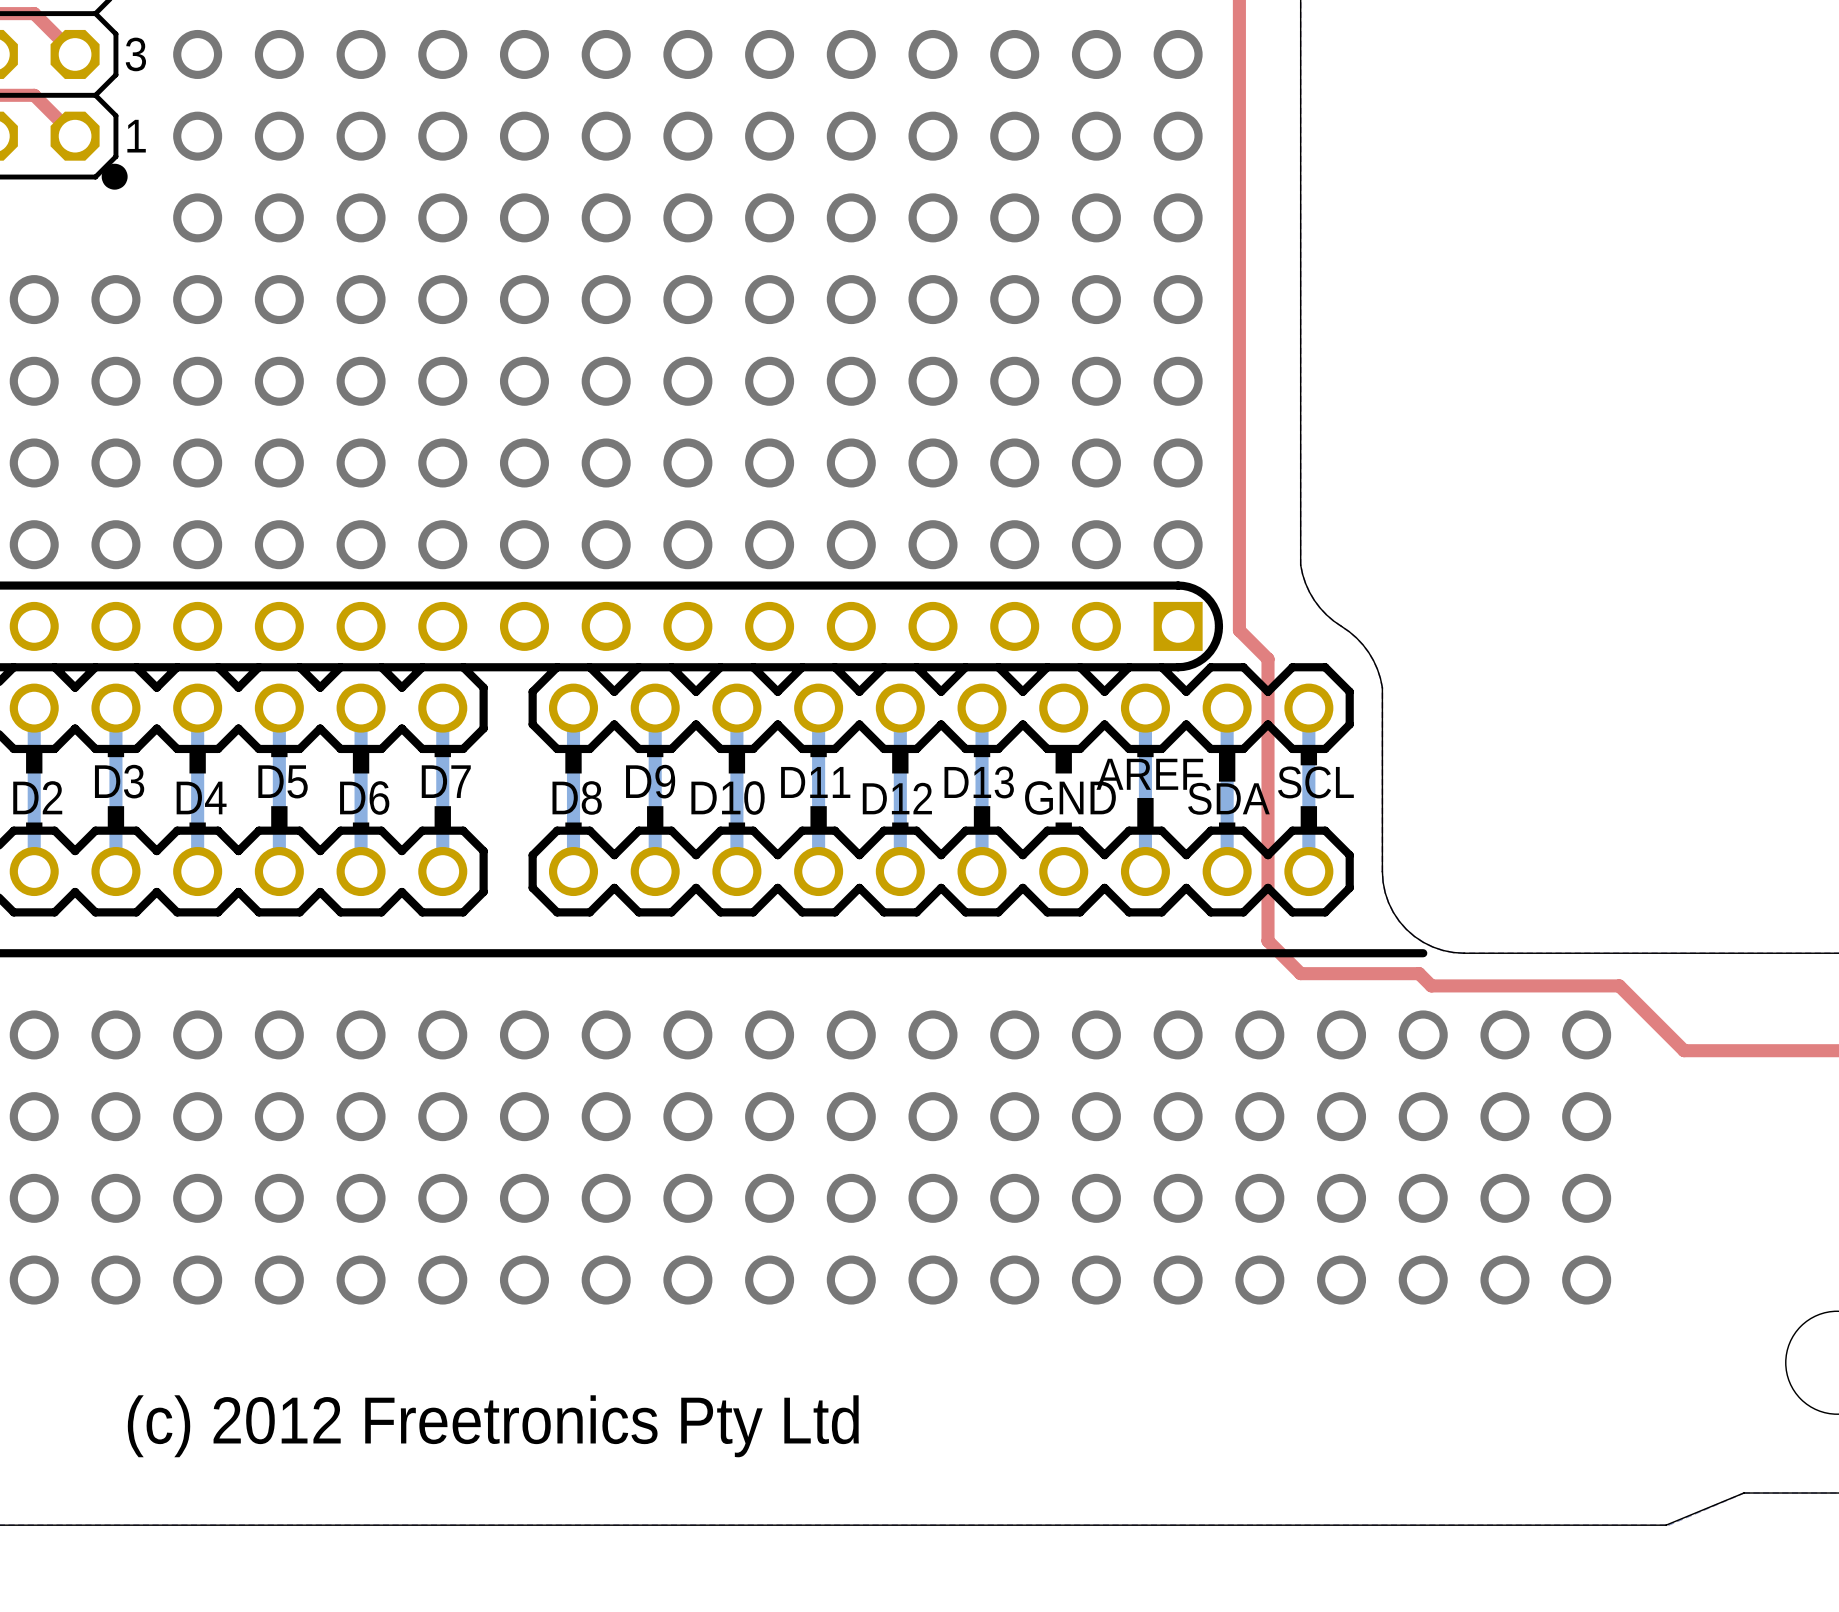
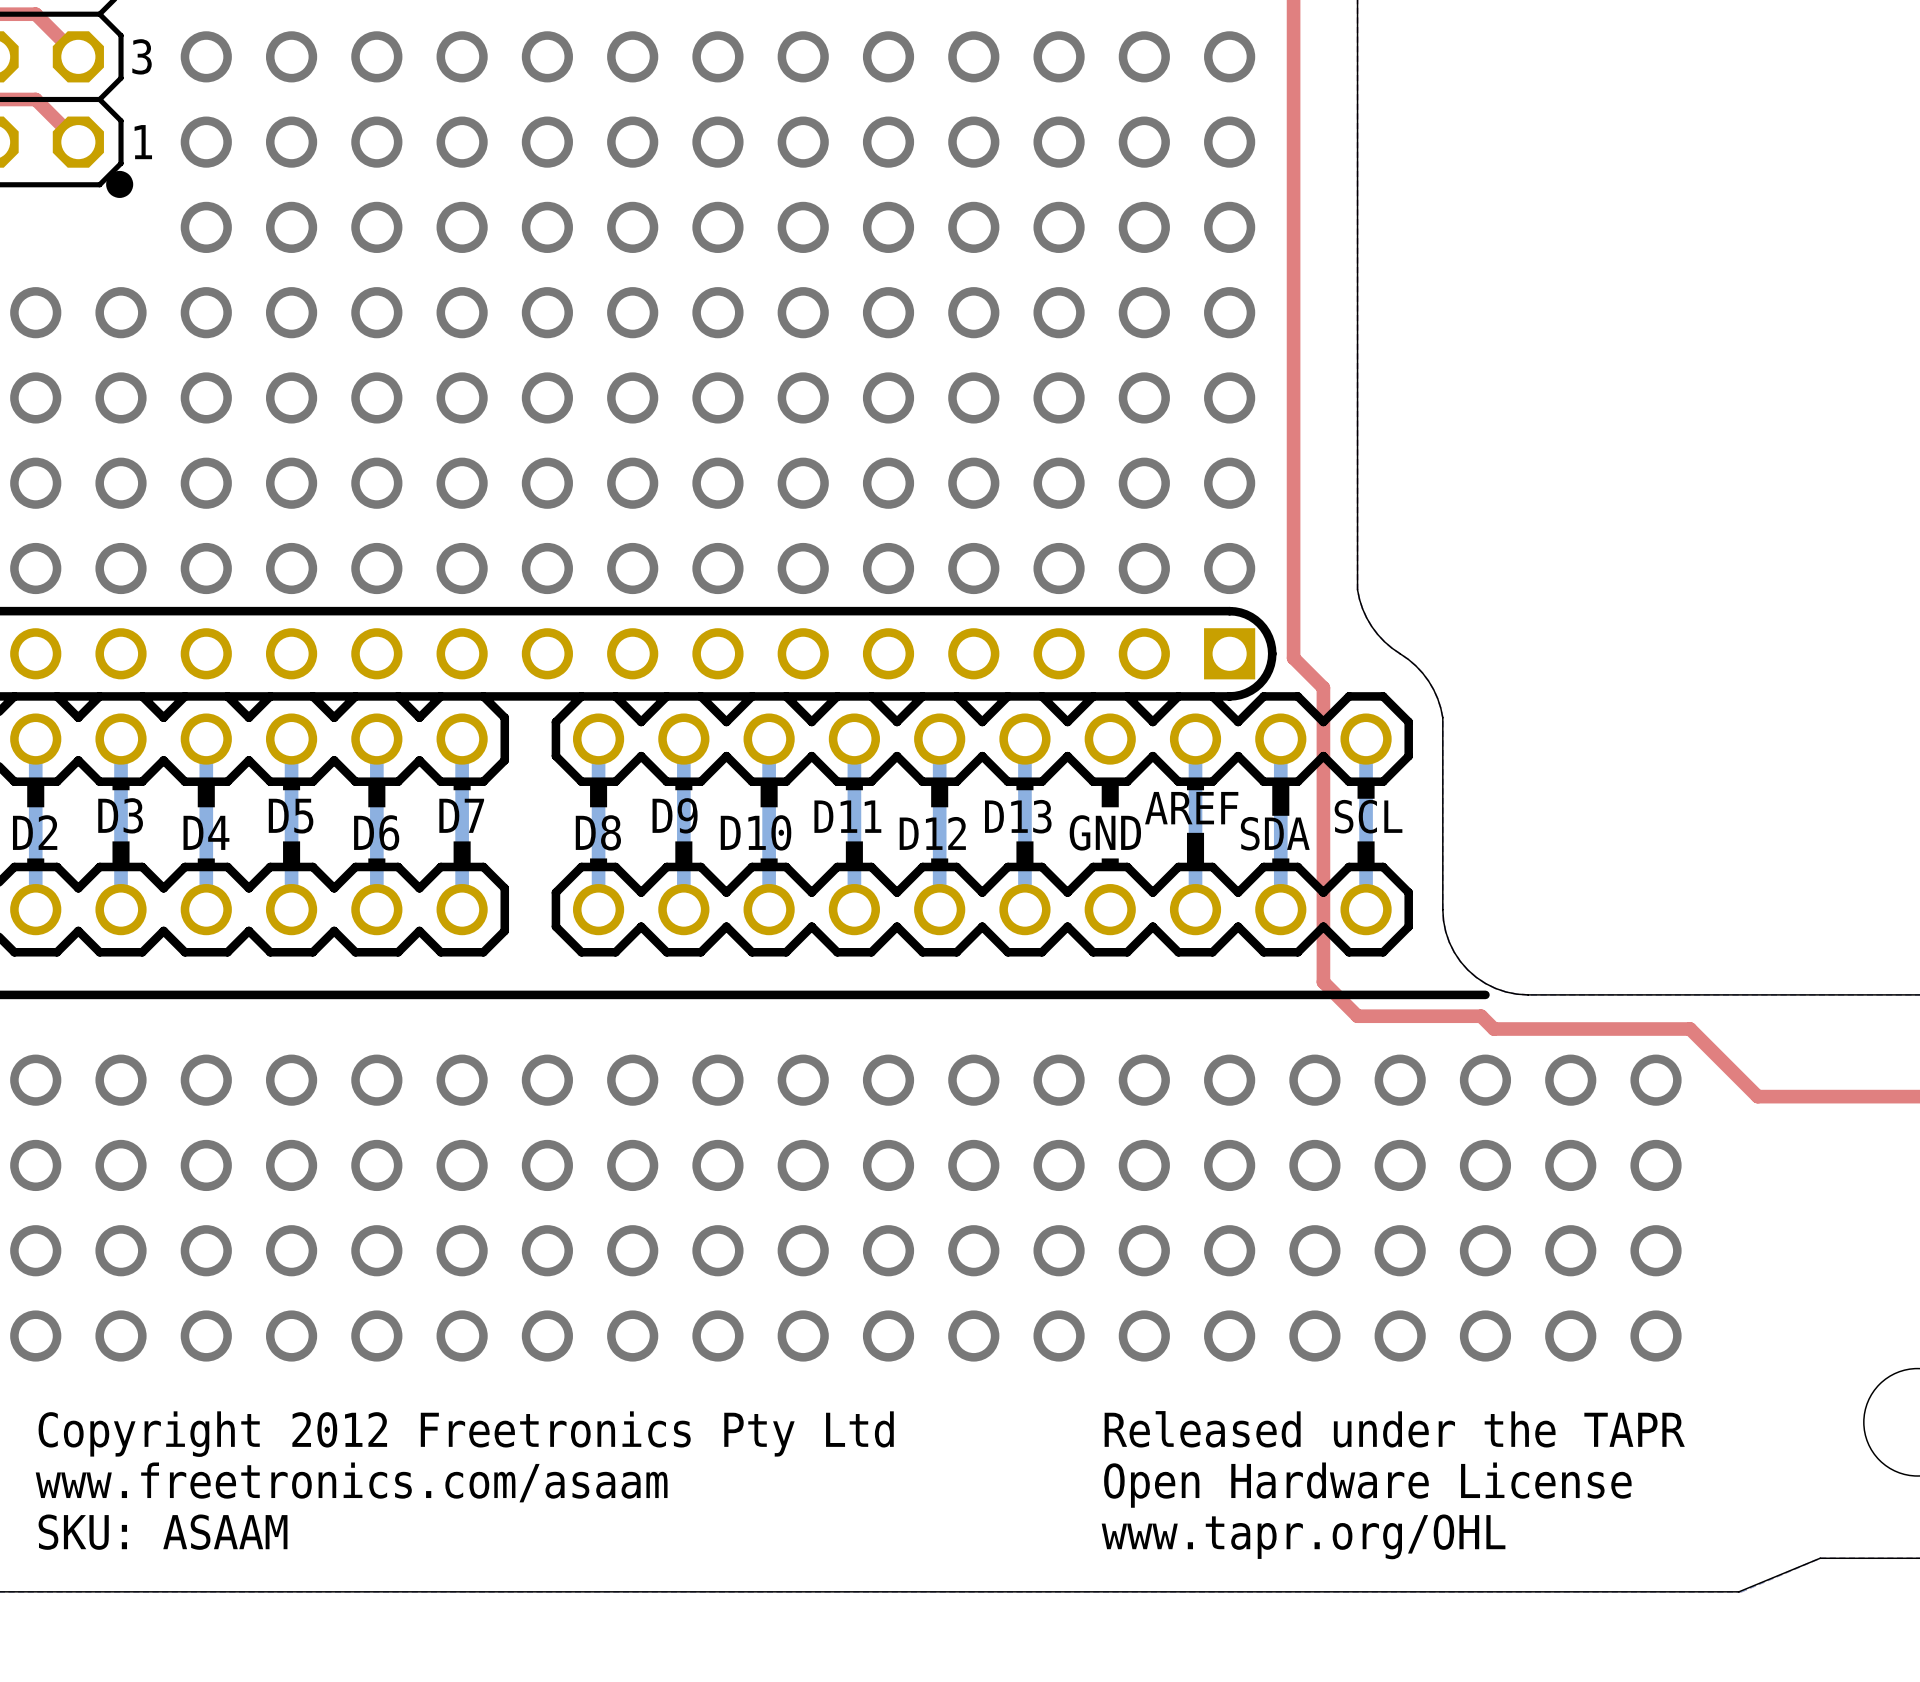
text: none -> Released under the TAPR (1394, 1429)
text: none -> www.freetronics.com/asaam (351, 1482)
text: none -> Open Hardware License (1367, 1485)
text: (c) 2012 Freetronics Pty Ltd (493, 1426) -> Copyright 2012 Freetronics Pty Ltd (466, 1434)
text: none -> SKU: ASAAM (163, 1532)
text: none -> www.tapr.org/OHL (1303, 1536)

